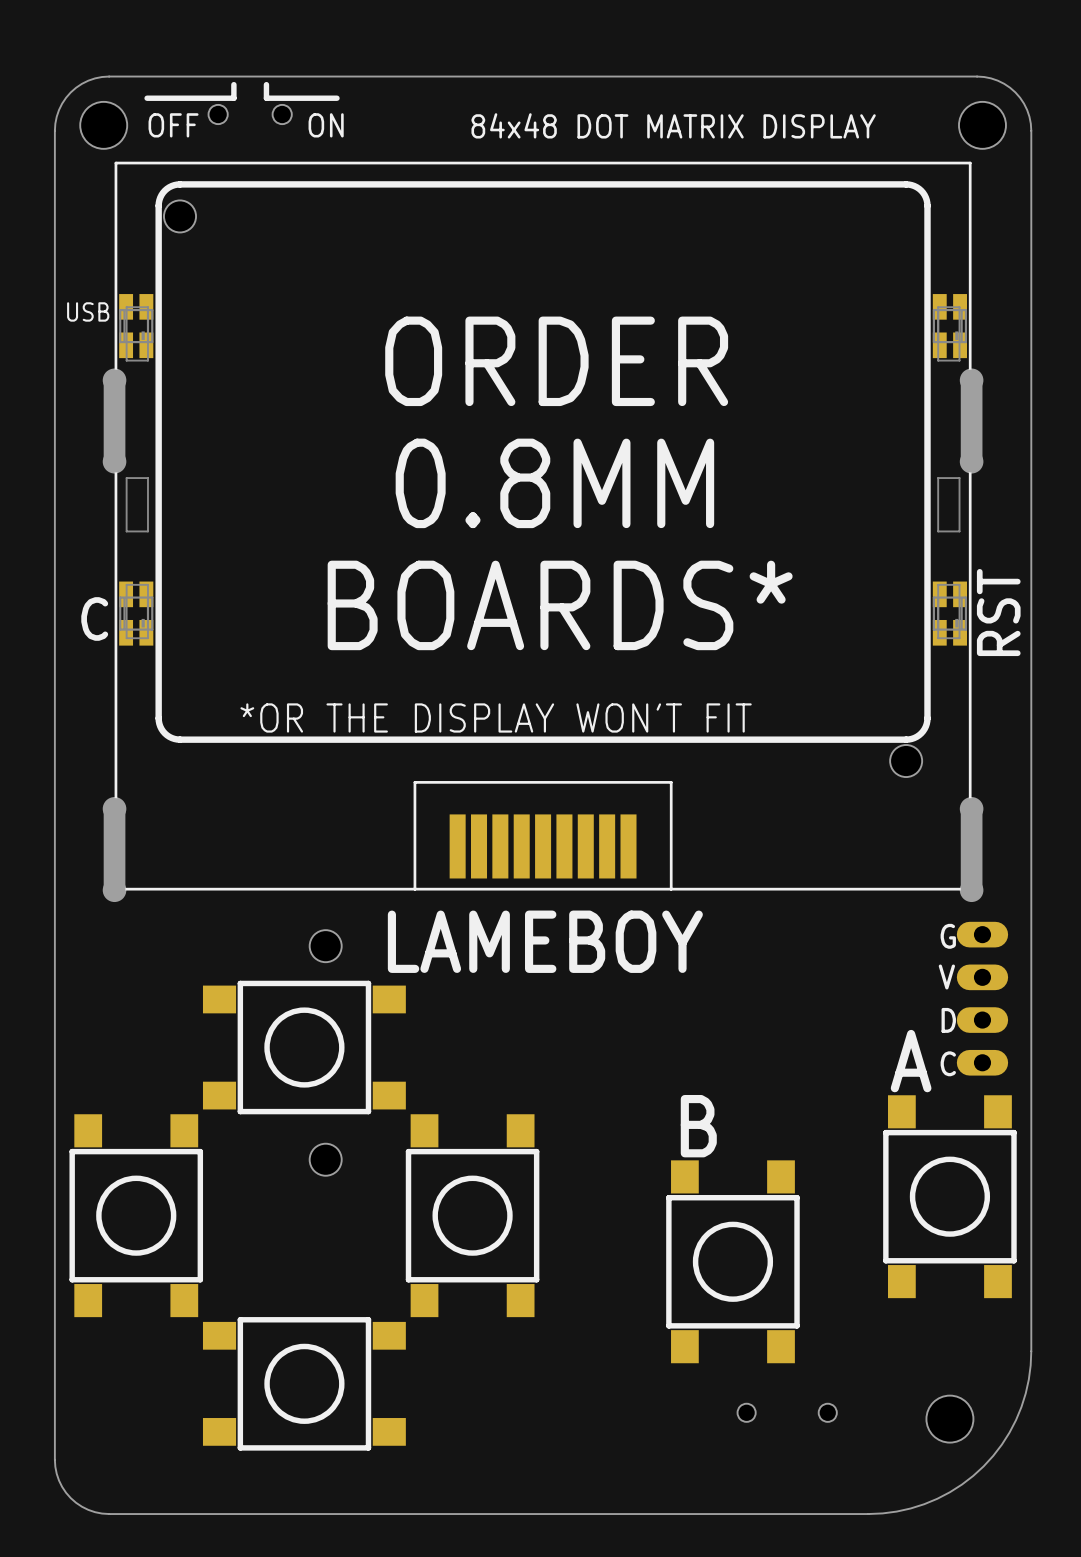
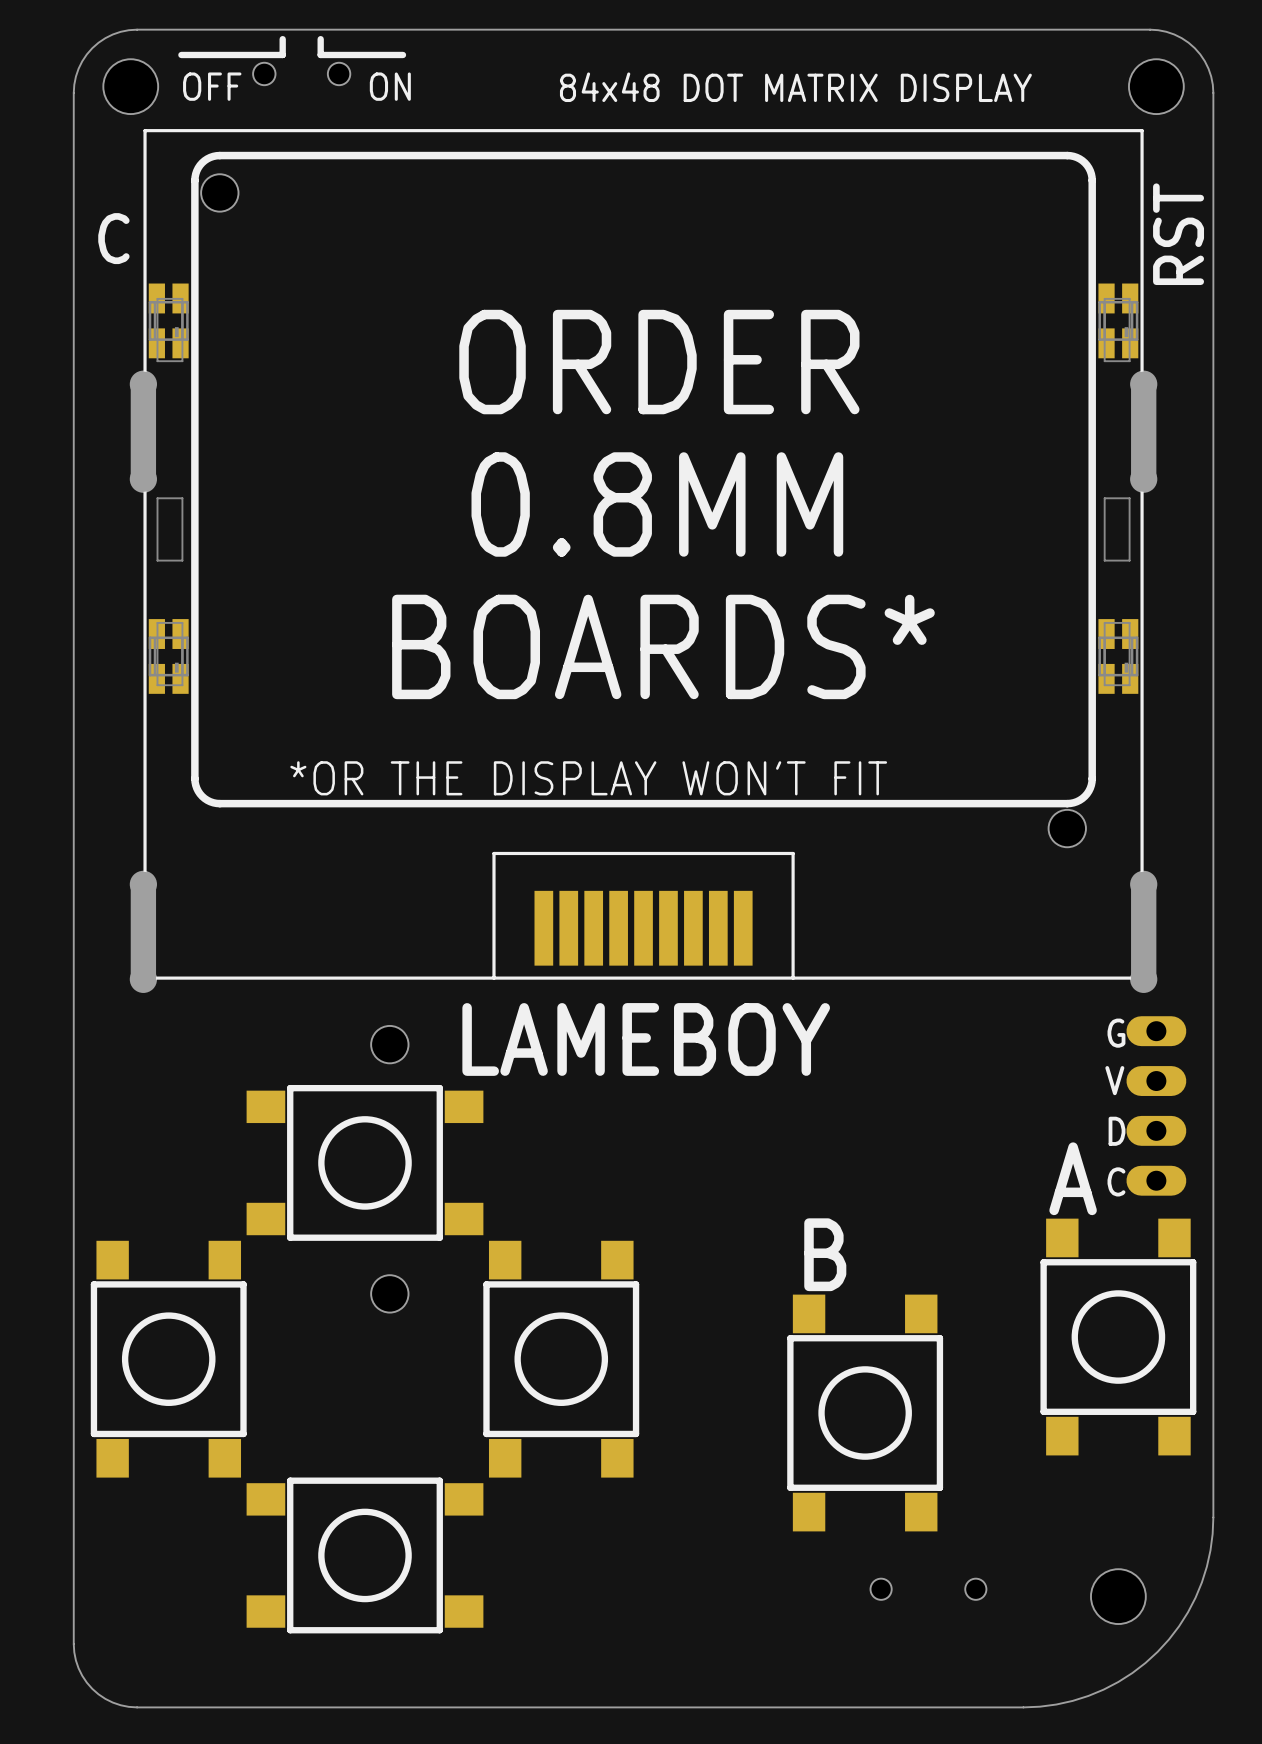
text: USB (88, 311) -> none
text position: RST (998, 612) -> RST (1178, 234)
text position: C (94, 618) -> C (113, 238)

